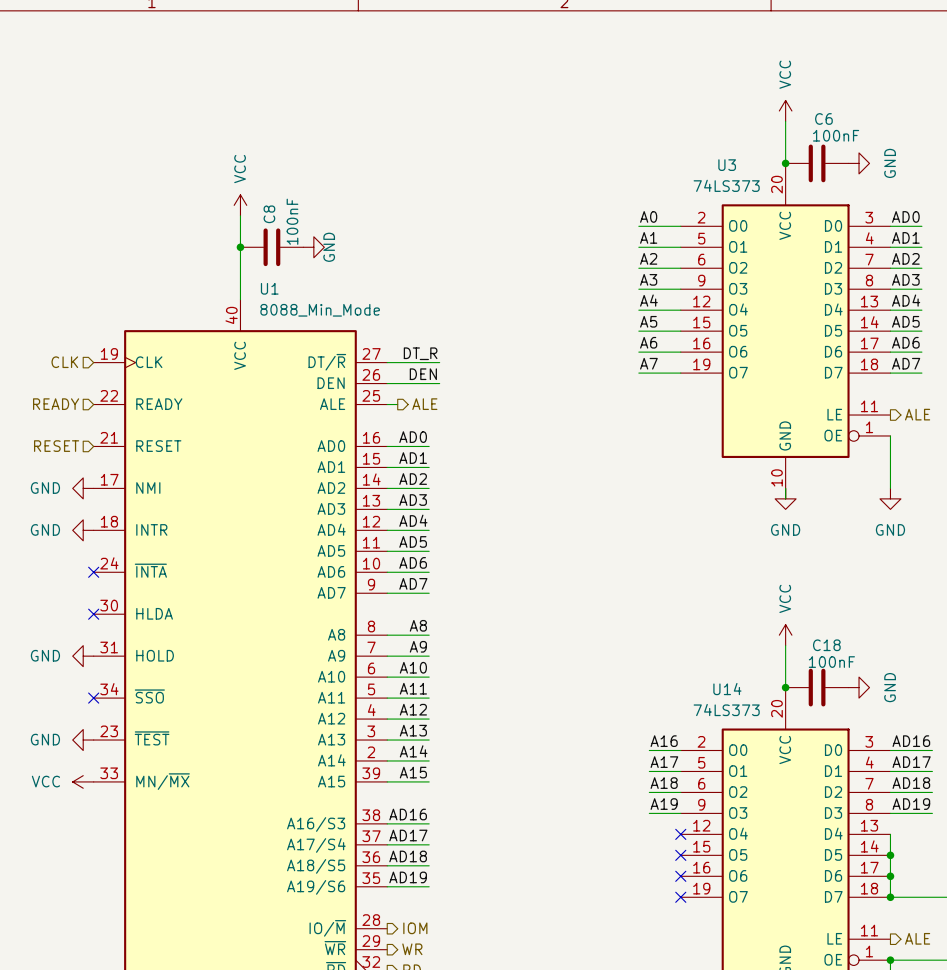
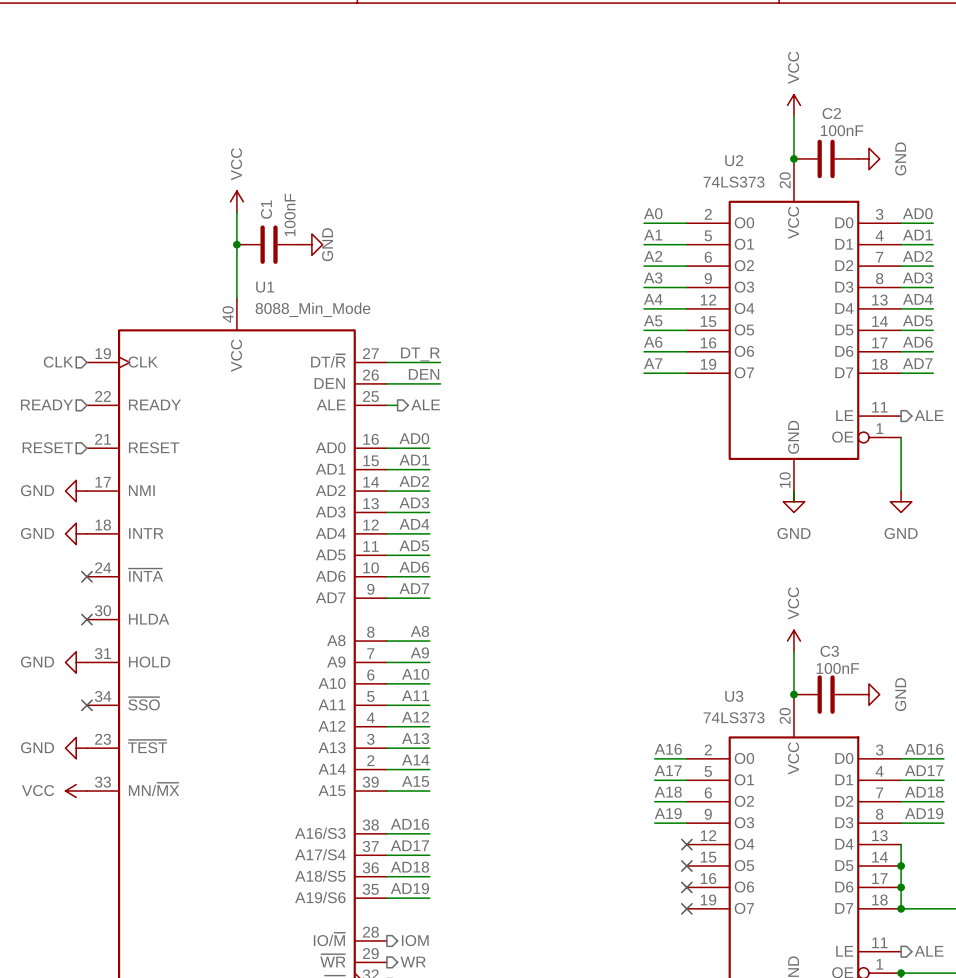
C6 name: C6 (823, 118) -> C2 (831, 113)
U3 name: U3 (727, 165) -> U2 (734, 160)
C8 name: C8 (269, 214) -> C1 (266, 209)
C18 name: C18 (826, 645) -> C3 (829, 651)
U14 name: U14 (727, 689) -> U3 (734, 696)

